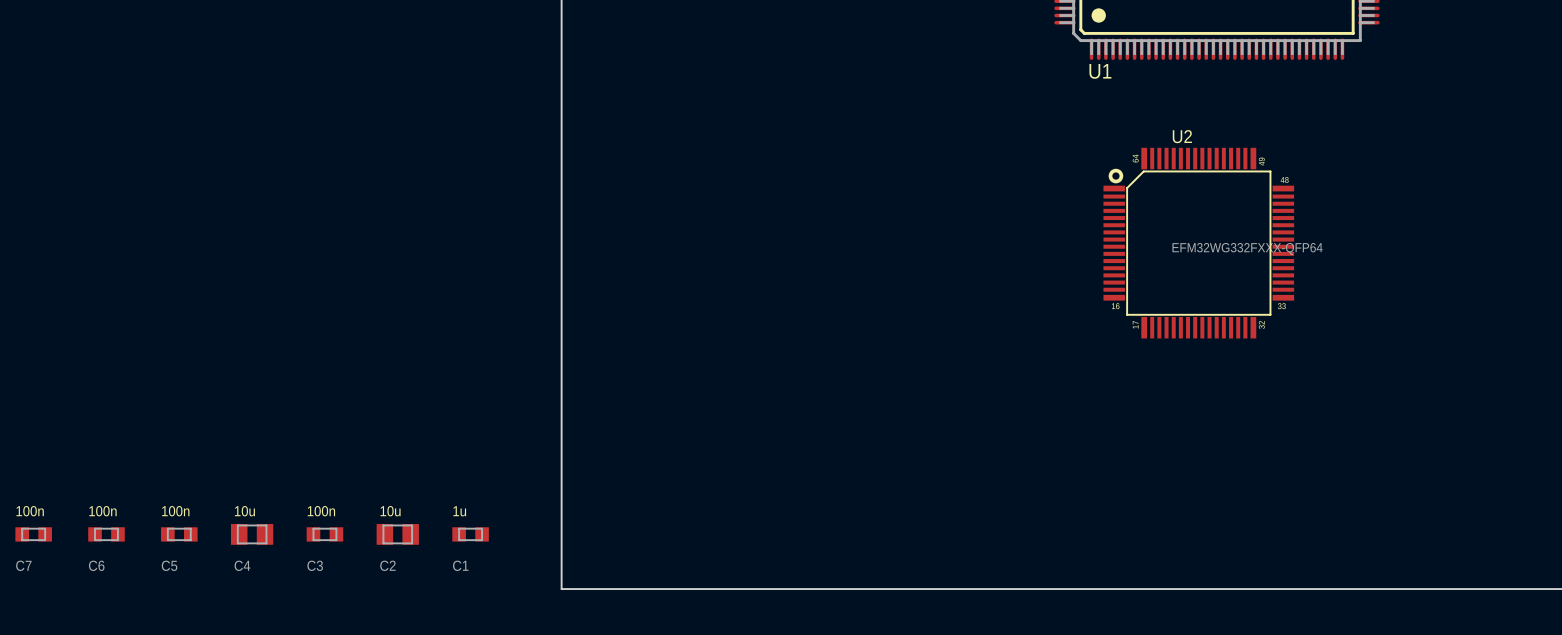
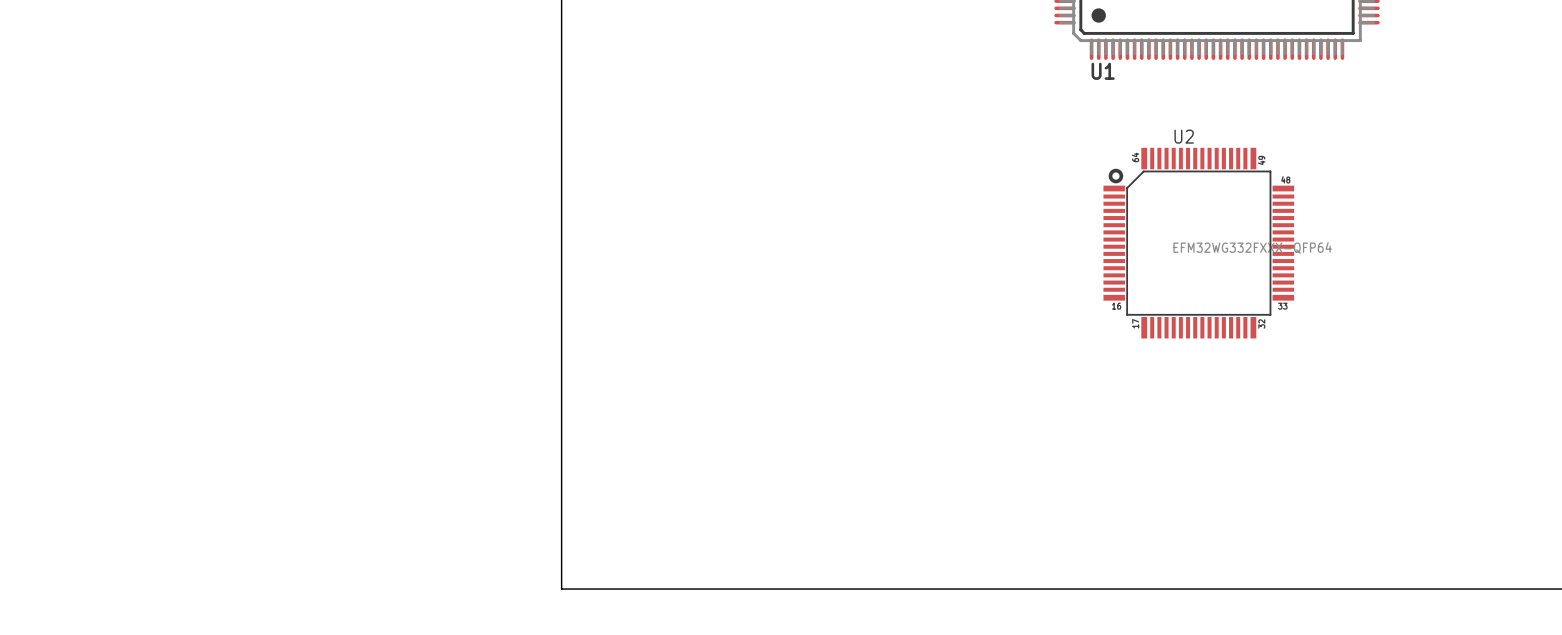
C7: 100n (33, 534) -> none
C6: 100n (106, 534) -> none
C5: 100n (179, 534) -> none
C4: 10u (252, 534) -> none
C3: 100n (324, 534) -> none
C2: 10u (397, 534) -> none
C1: 1u (470, 534) -> none

